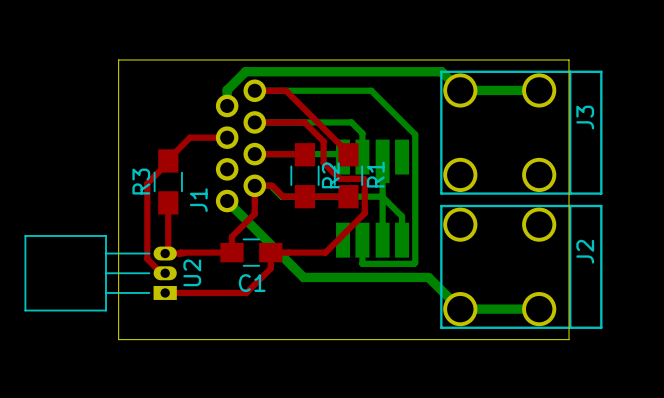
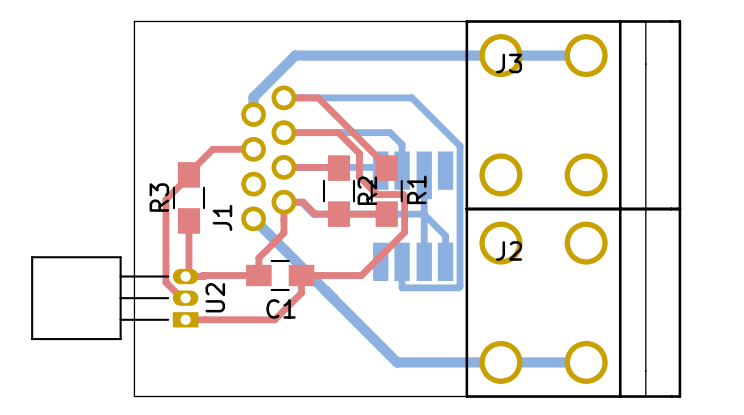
board edge: (118, 60) (569, 60) (569, 339) (118, 339) -> (134, 64) (134, 21) (645, 21) (645, 396) (134, 396) (134, 370)
J3 footprint: [440, 70, 603, 195] -> [465, 20, 682, 211]
bottom track: (245, 71) (441, 71) (460, 90) (539, 90) -> (273, 76) (295, 55) (586, 55)
J3 name position: J3 (585, 117) -> J3 (509, 63)
J2 footprint: [440, 204, 603, 329] -> [465, 207, 682, 398]
J2 name position: J2 (585, 251) -> J2 (509, 250)
bottom track: (303, 277) (428, 277) (460, 309) (539, 309) -> (337, 302) (397, 362) (586, 362)

